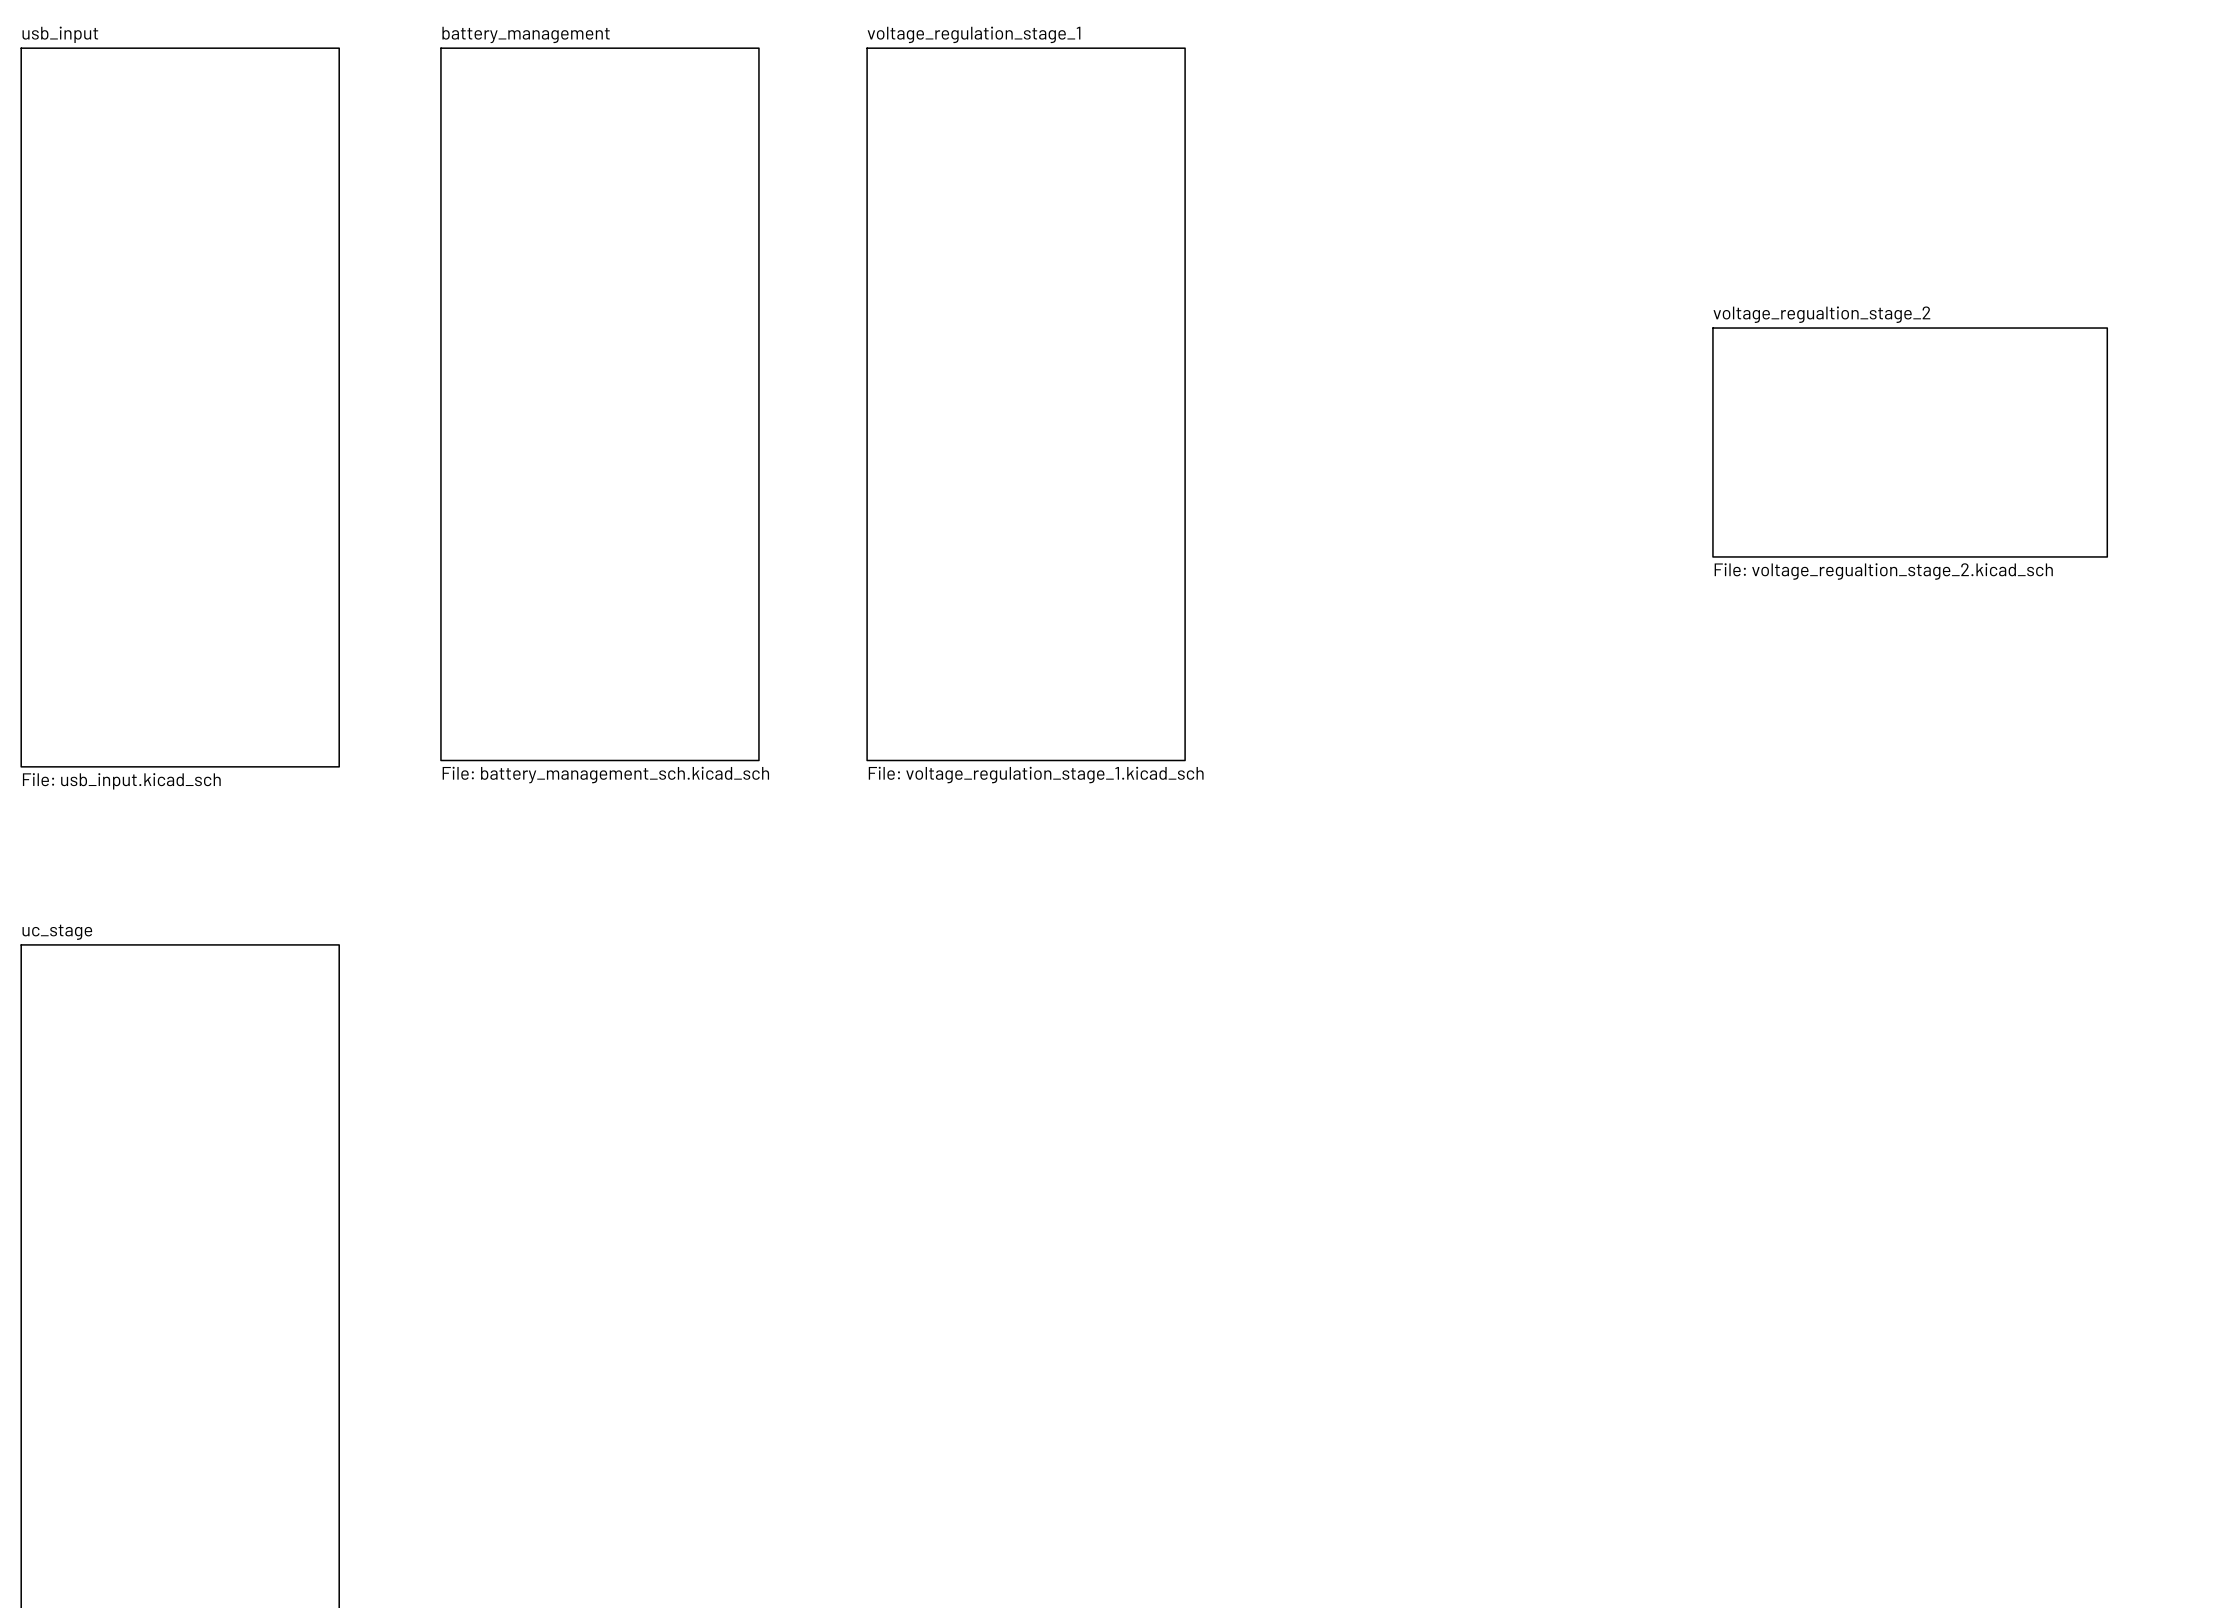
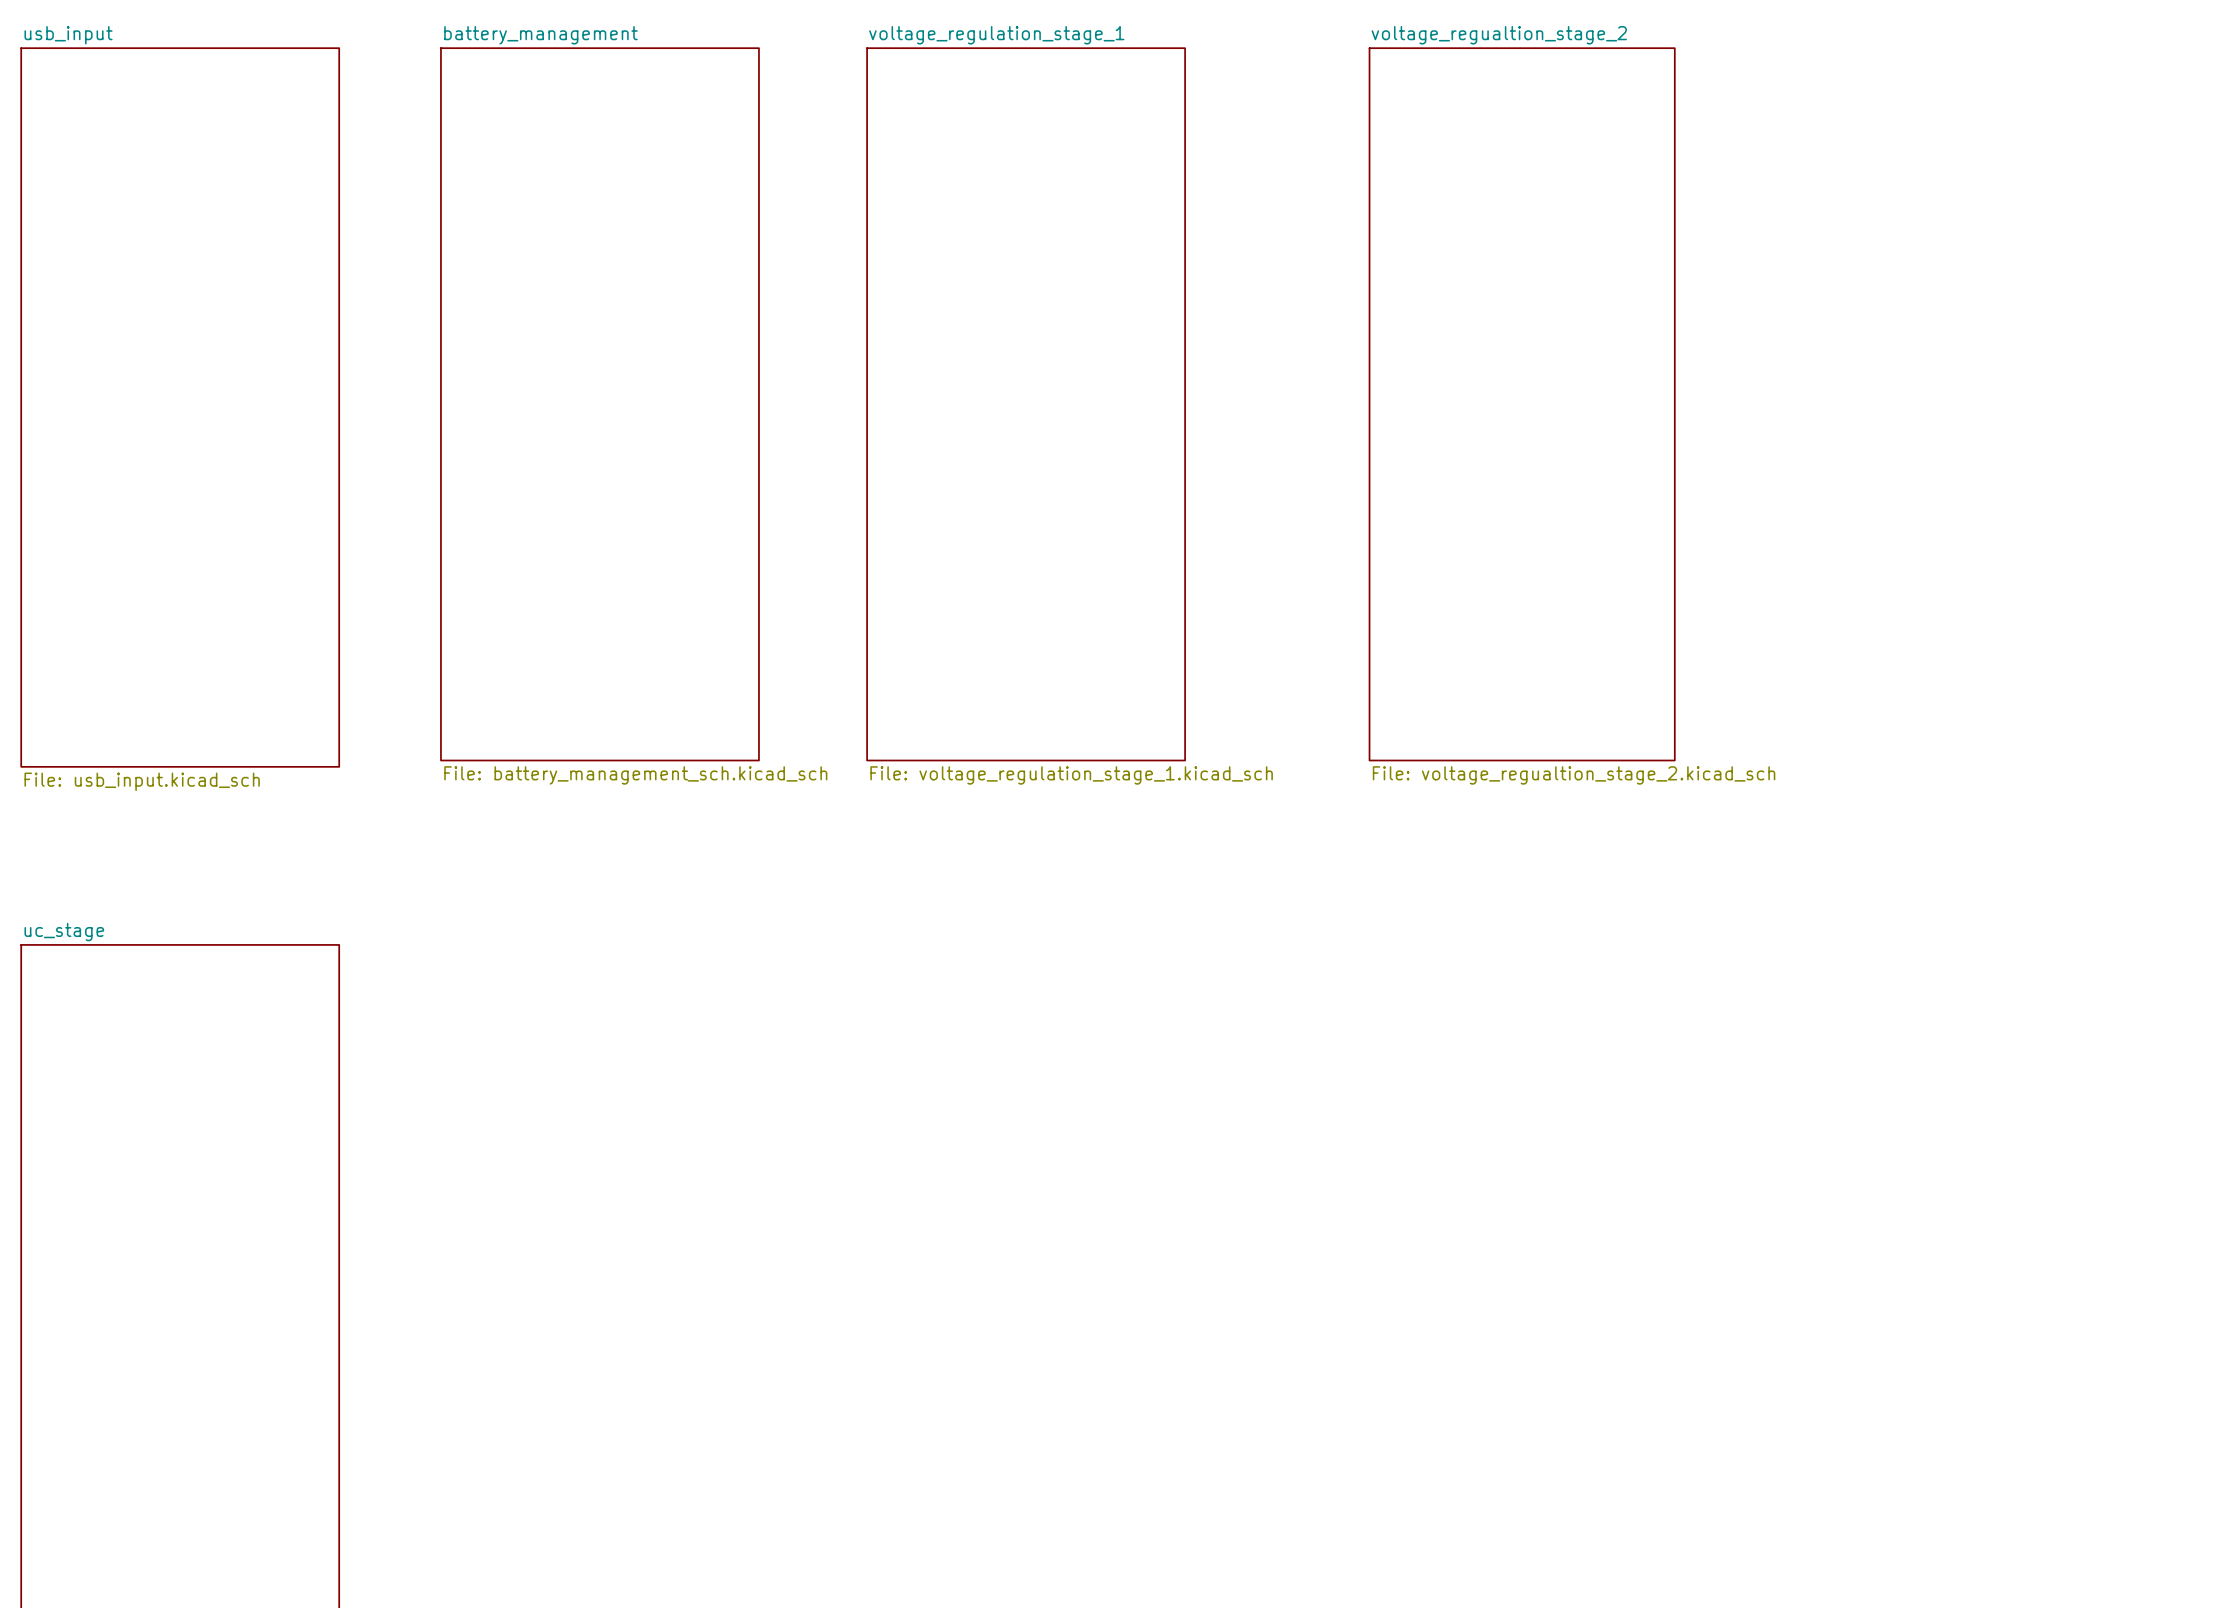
sheet voltage_regualtion_stage_2 name position: voltage_regualtion_stage_2 (1821, 314) -> voltage_regualtion_stage_2 (1499, 35)
sheet voltage_regualtion_stage_2 shape: [1712, 327, 2109, 558] -> [1368, 47, 1676, 762]
sheet voltage_regualtion_stage_2 value position: File: voltage_regualtion_stage_2.kicad_sch (1883, 571) -> File: voltage_regualtion_stage_2.kicad_sch (1574, 775)

